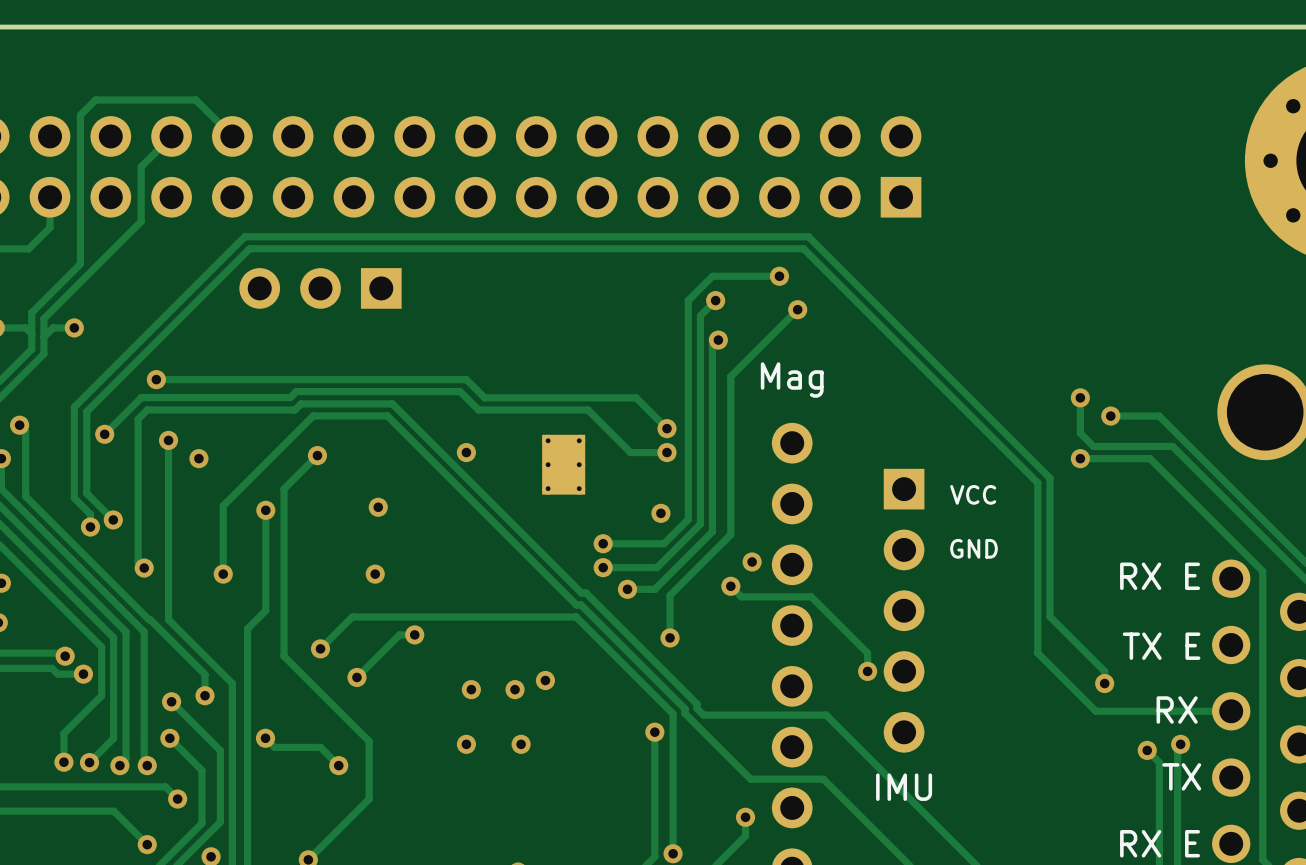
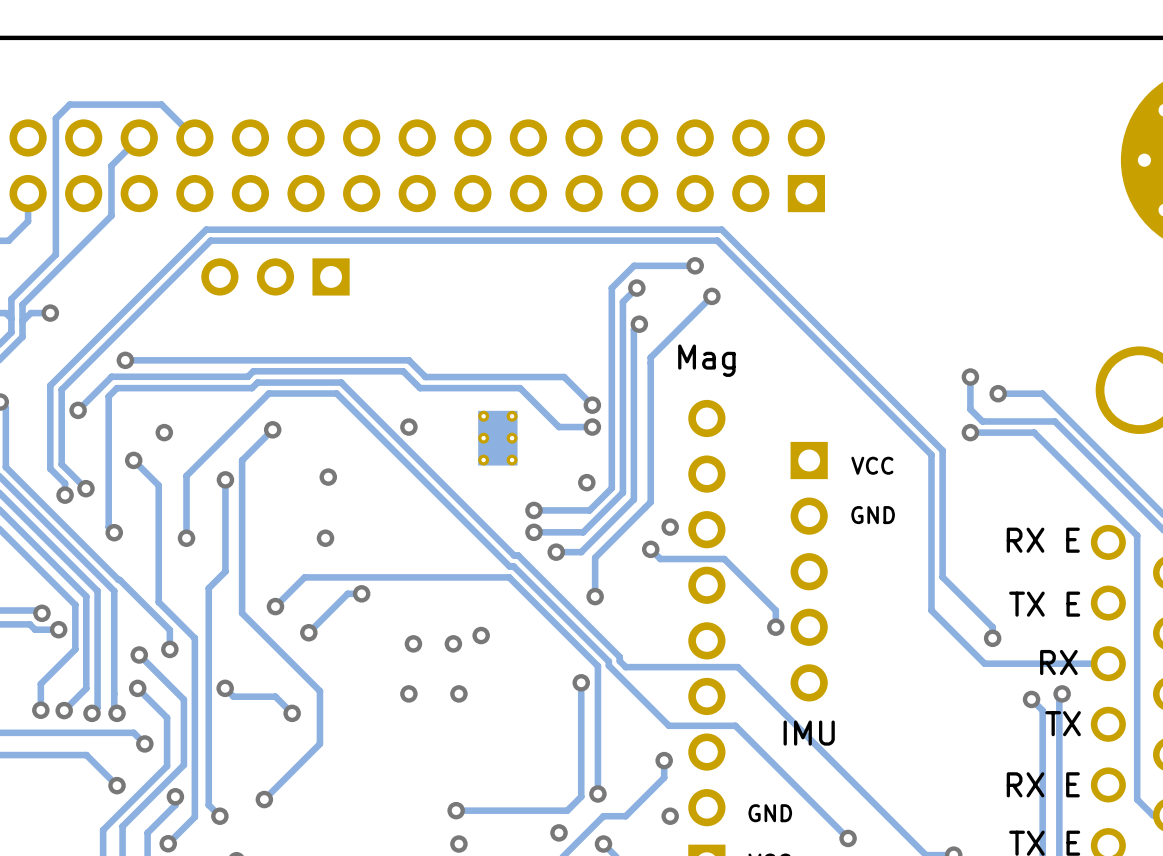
track: (168, 440) (168, 619) (192, 644) -> (133, 460) (158, 485) (158, 602)
via position: (168, 440) -> (133, 460)

